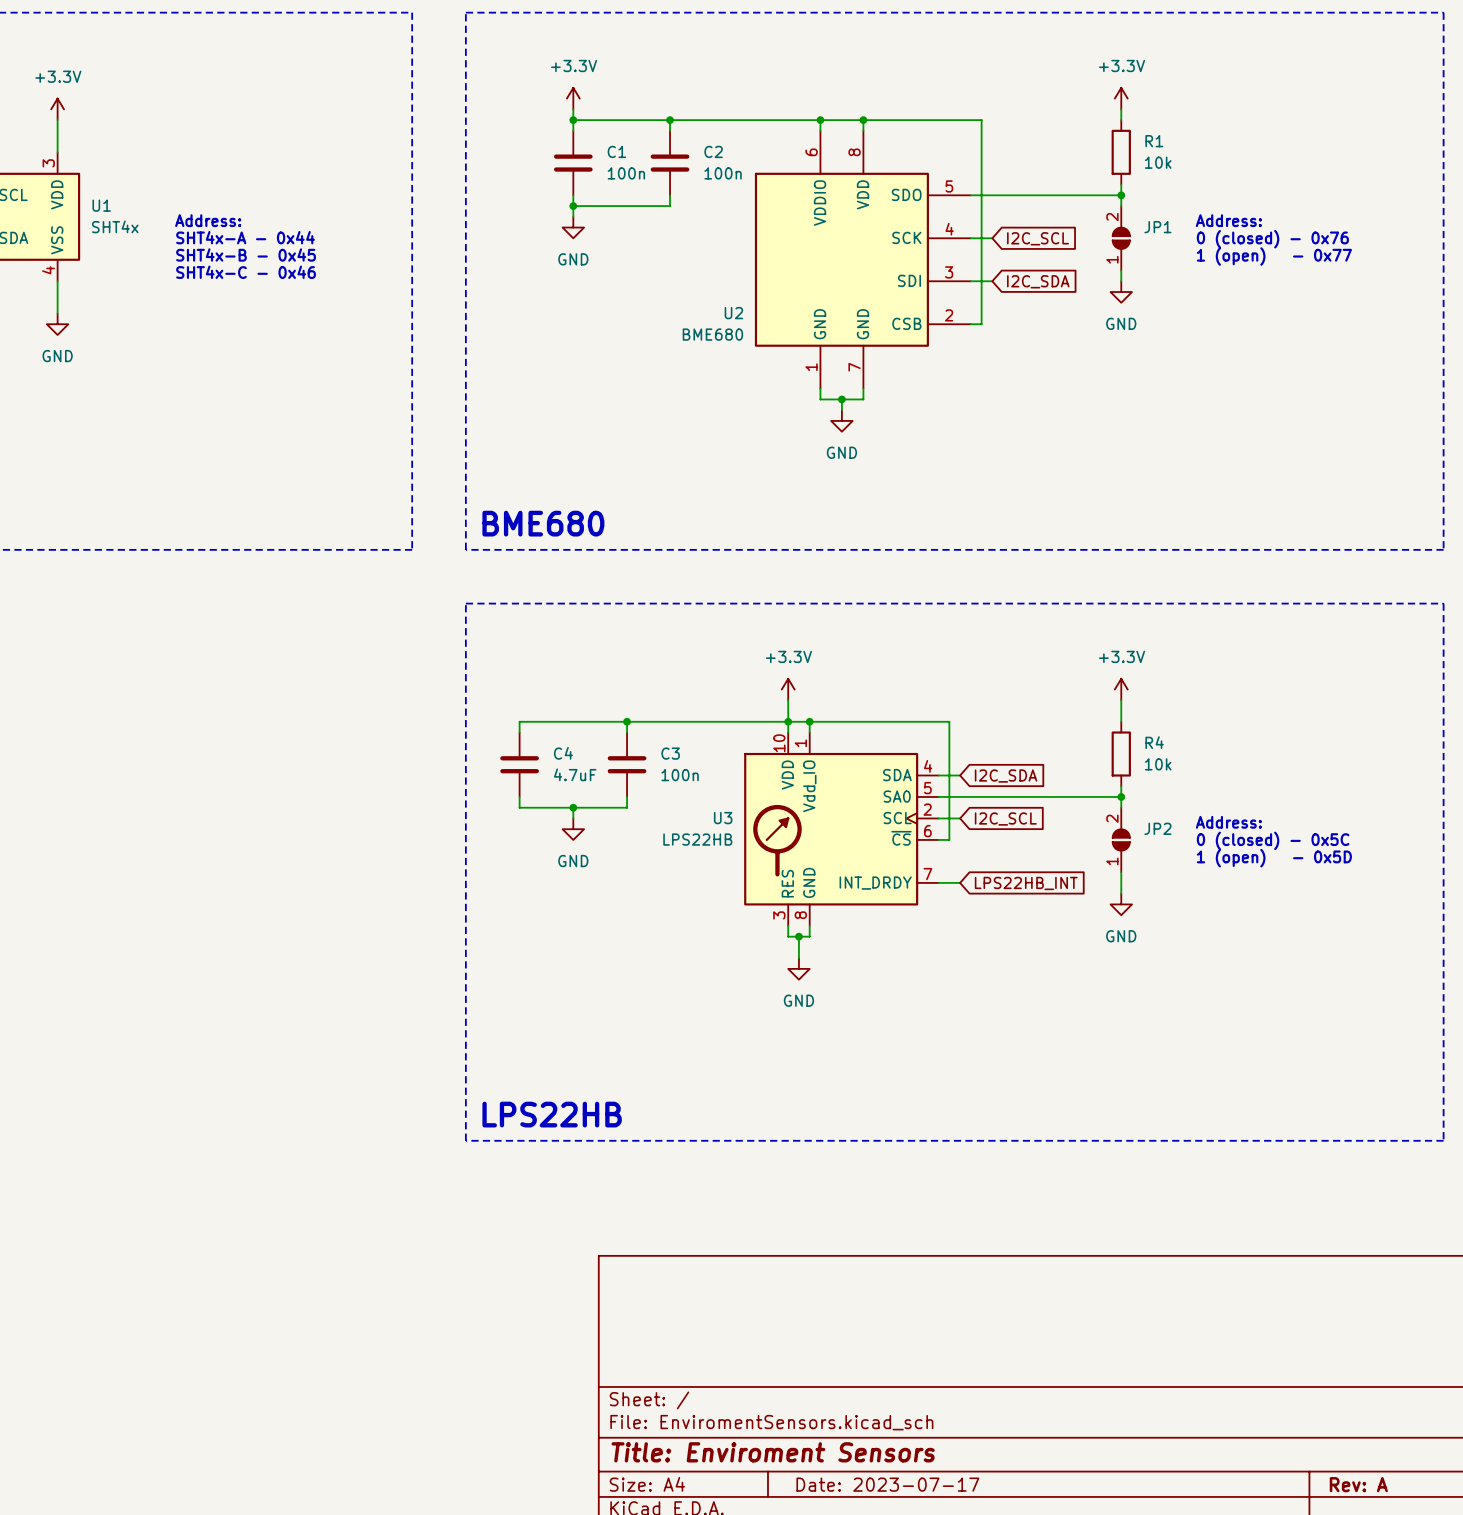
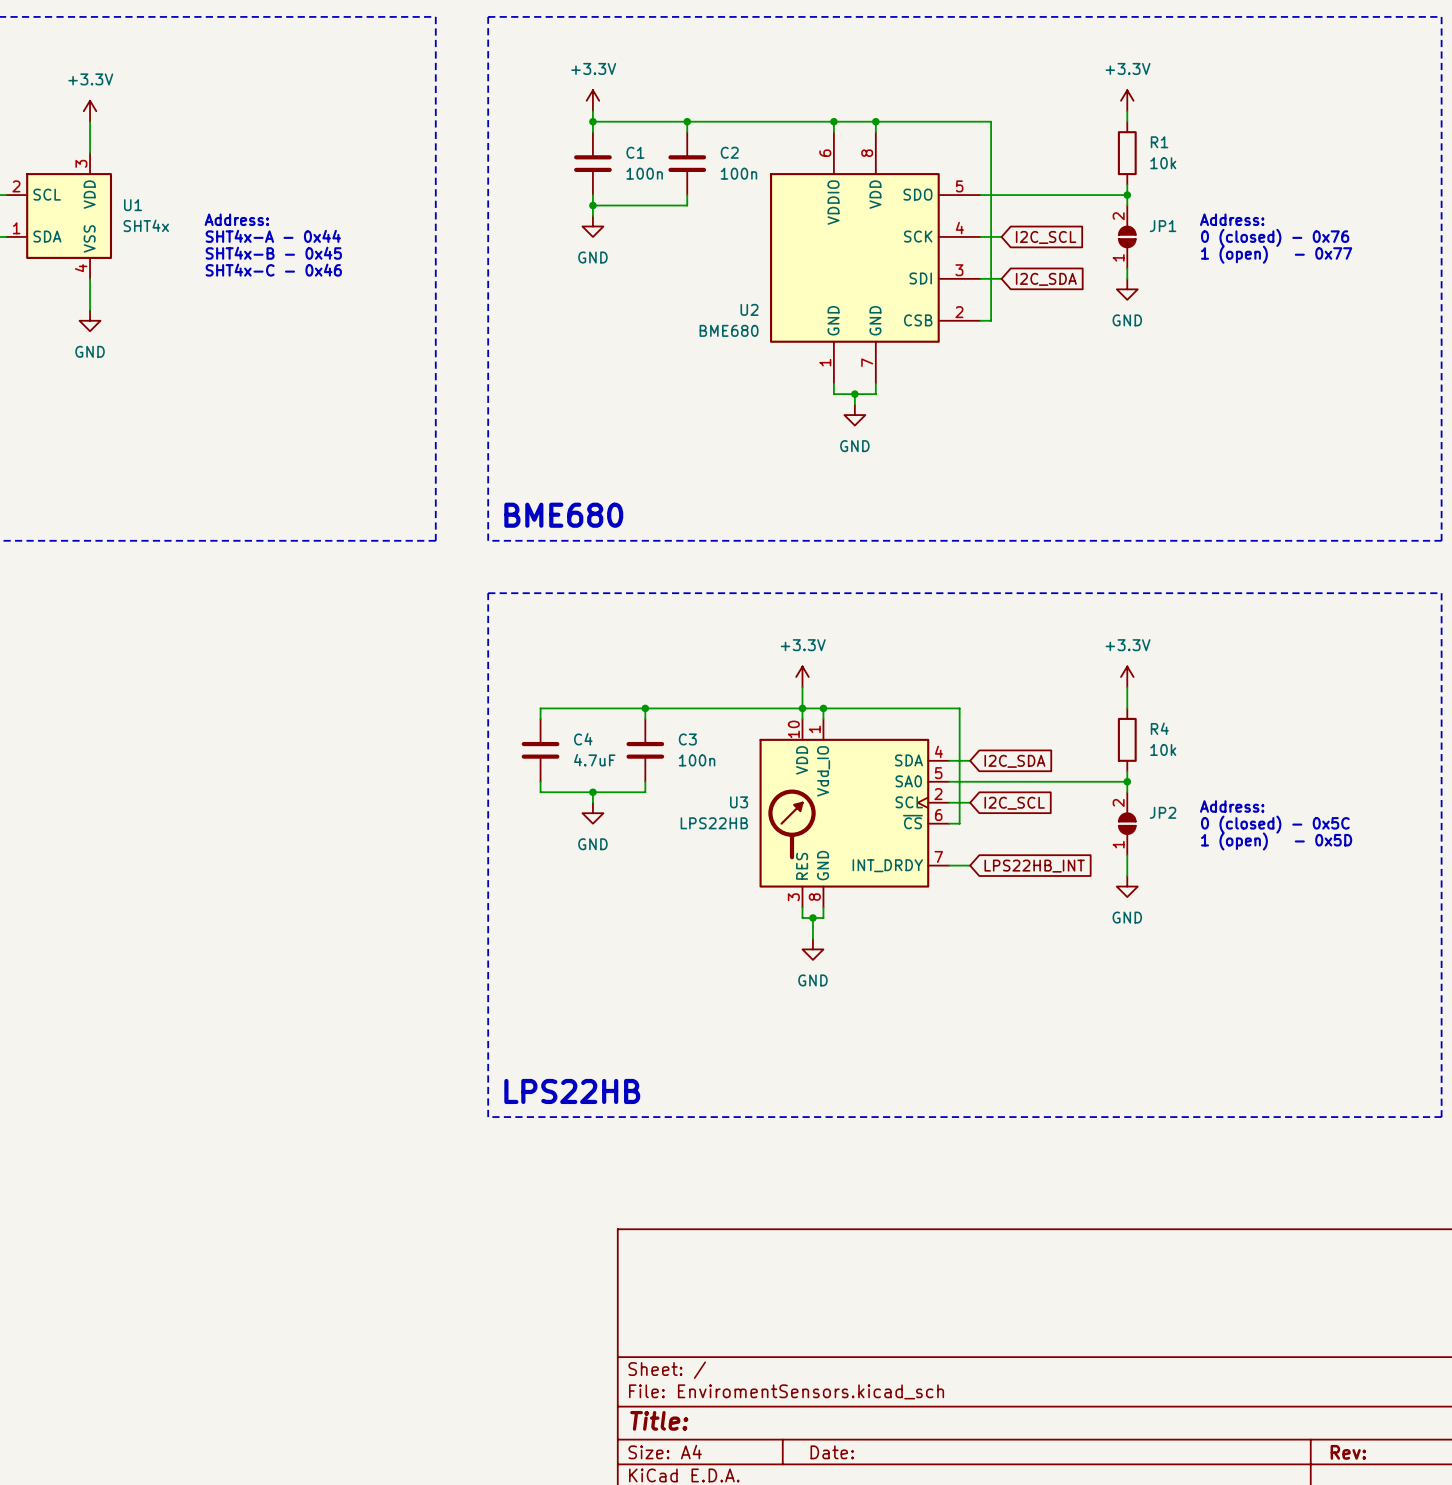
title block: Title: Enviroment Sensors (773, 1452) -> Title: (659, 1420)
title block: Date: 2023-07-17 (887, 1484) -> Date: (832, 1452)
title block: Rev: A (1358, 1484) -> Rev: (1348, 1452)

